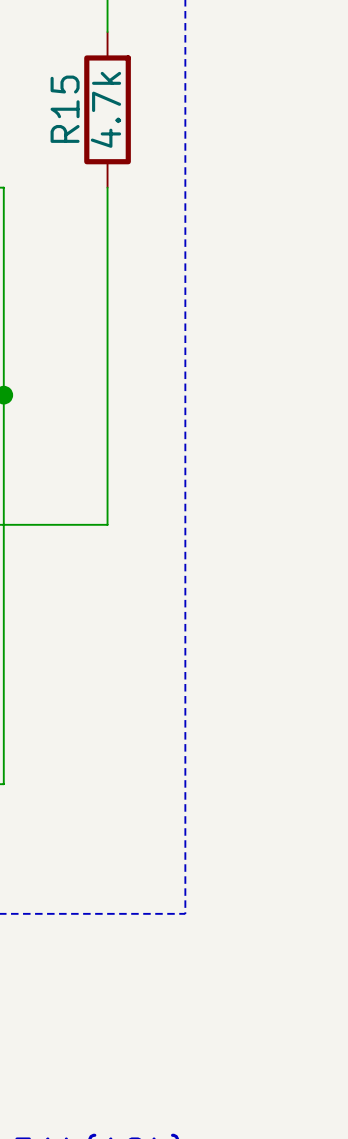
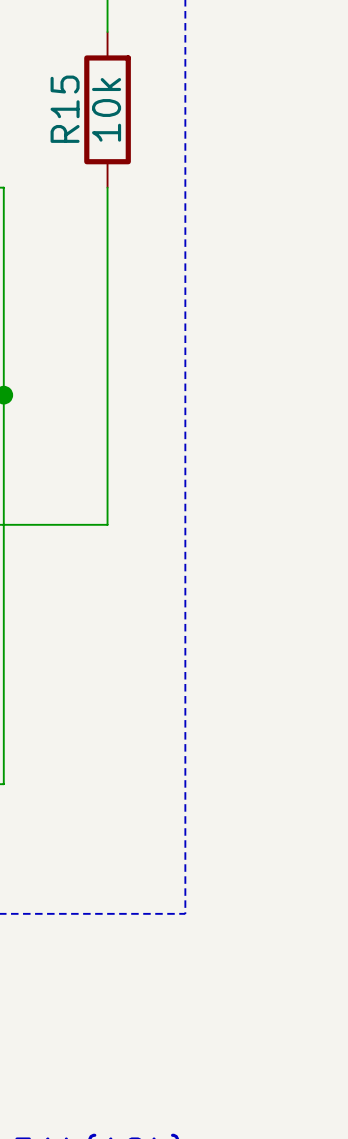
R15 value: 4.7k (105, 109) -> 10k (106, 109)

